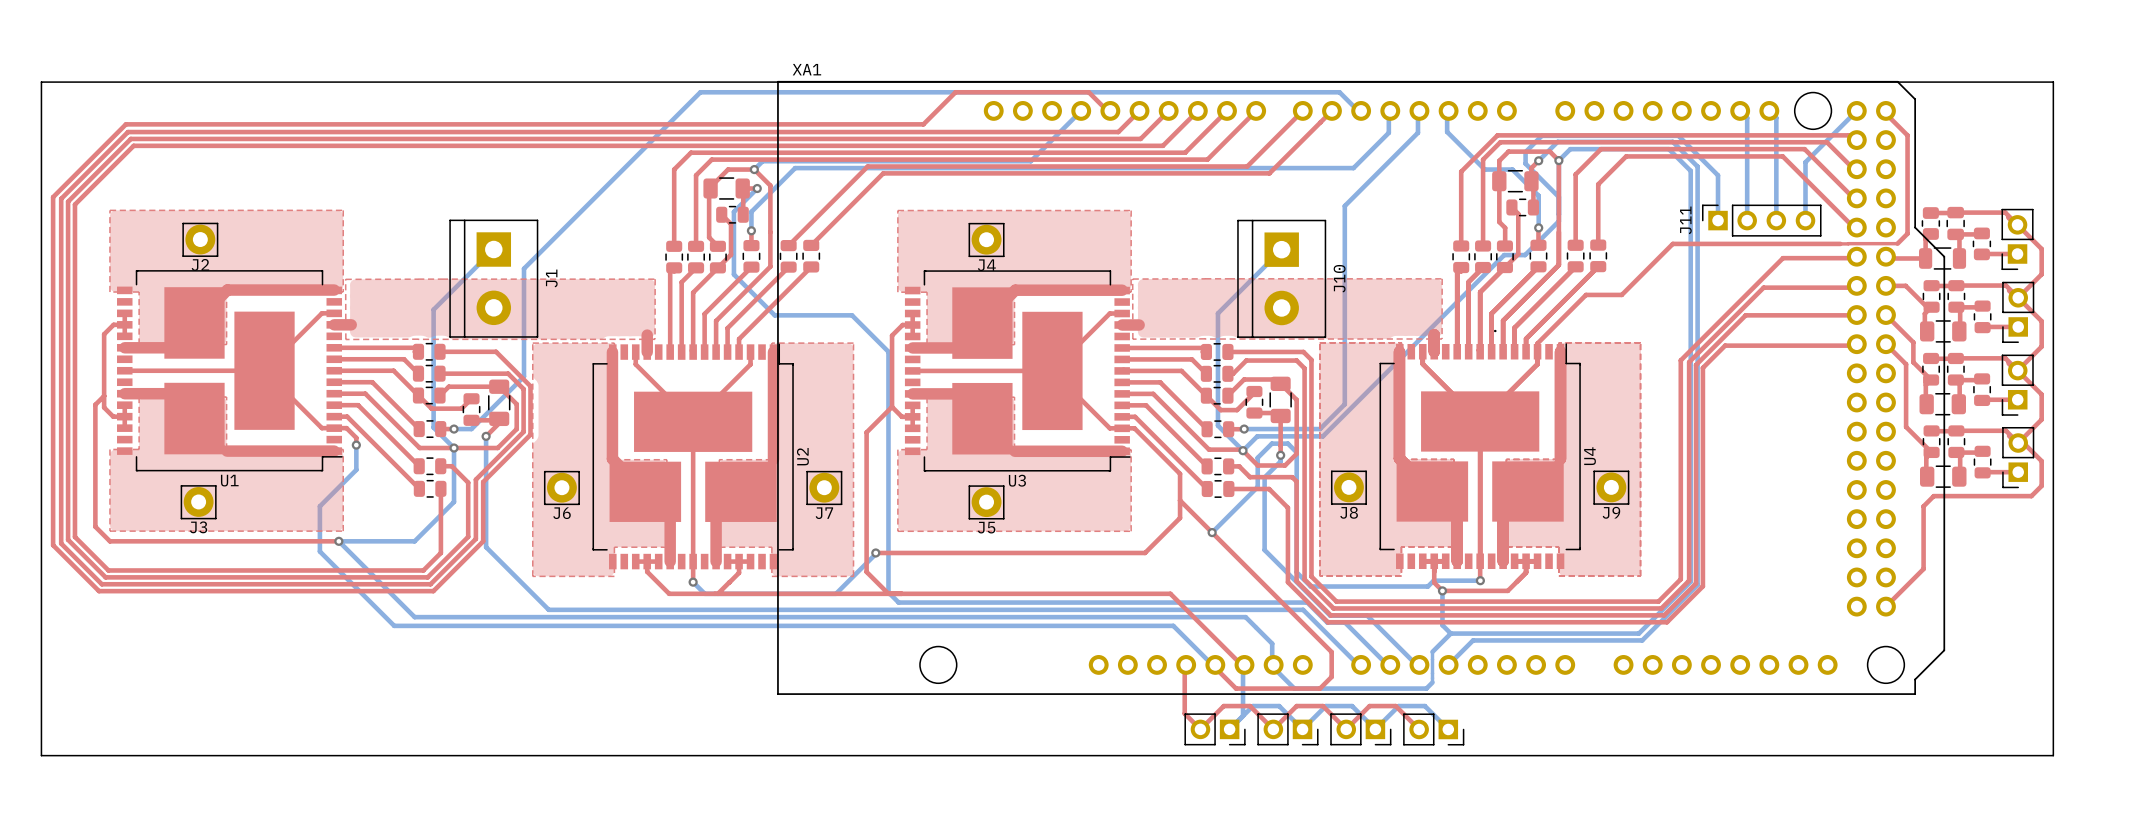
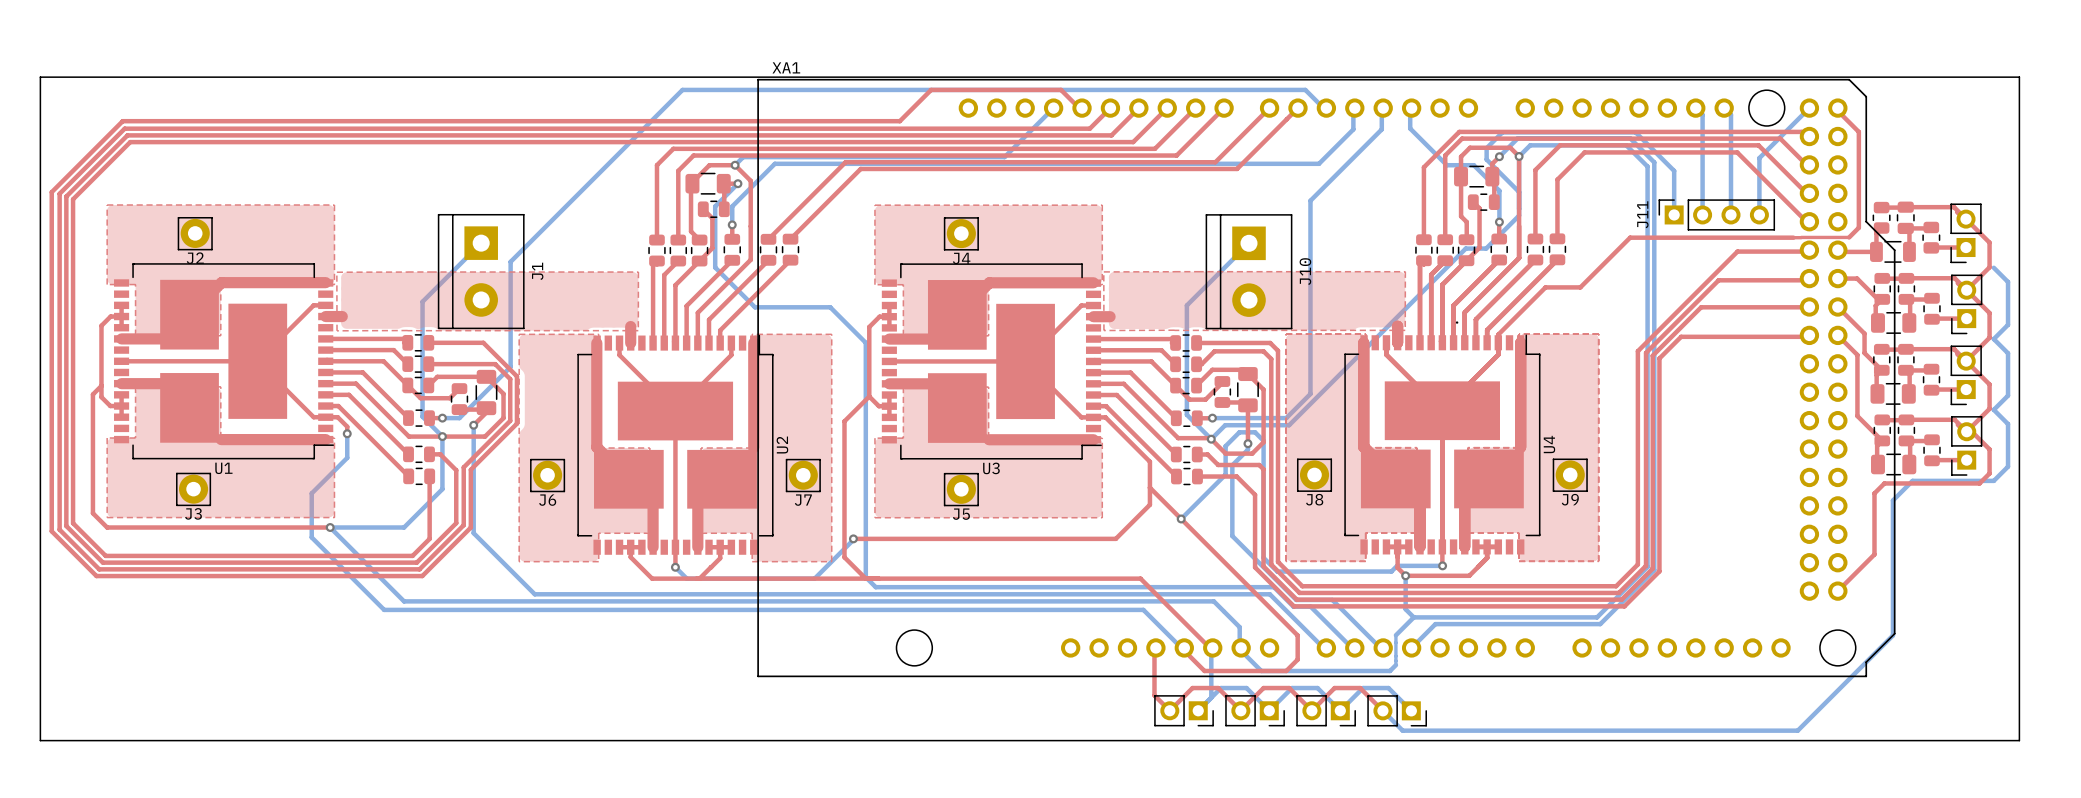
board edge: (41, 82) (2053, 82) (2053, 755) (41, 755) -> (40, 79) (40, 77) (2019, 77) (2019, 740) (40, 740) (40, 736)
bottom track: none -> (1993, 267) (2008, 281) (2008, 324) (1993, 339) (2008, 353) (2008, 395) (1993, 409) (2008, 424) (2008, 466) (1993, 480) (1912, 480) (1892, 500) (1892, 635) (1797, 730) (1402, 730) (1382, 710)

